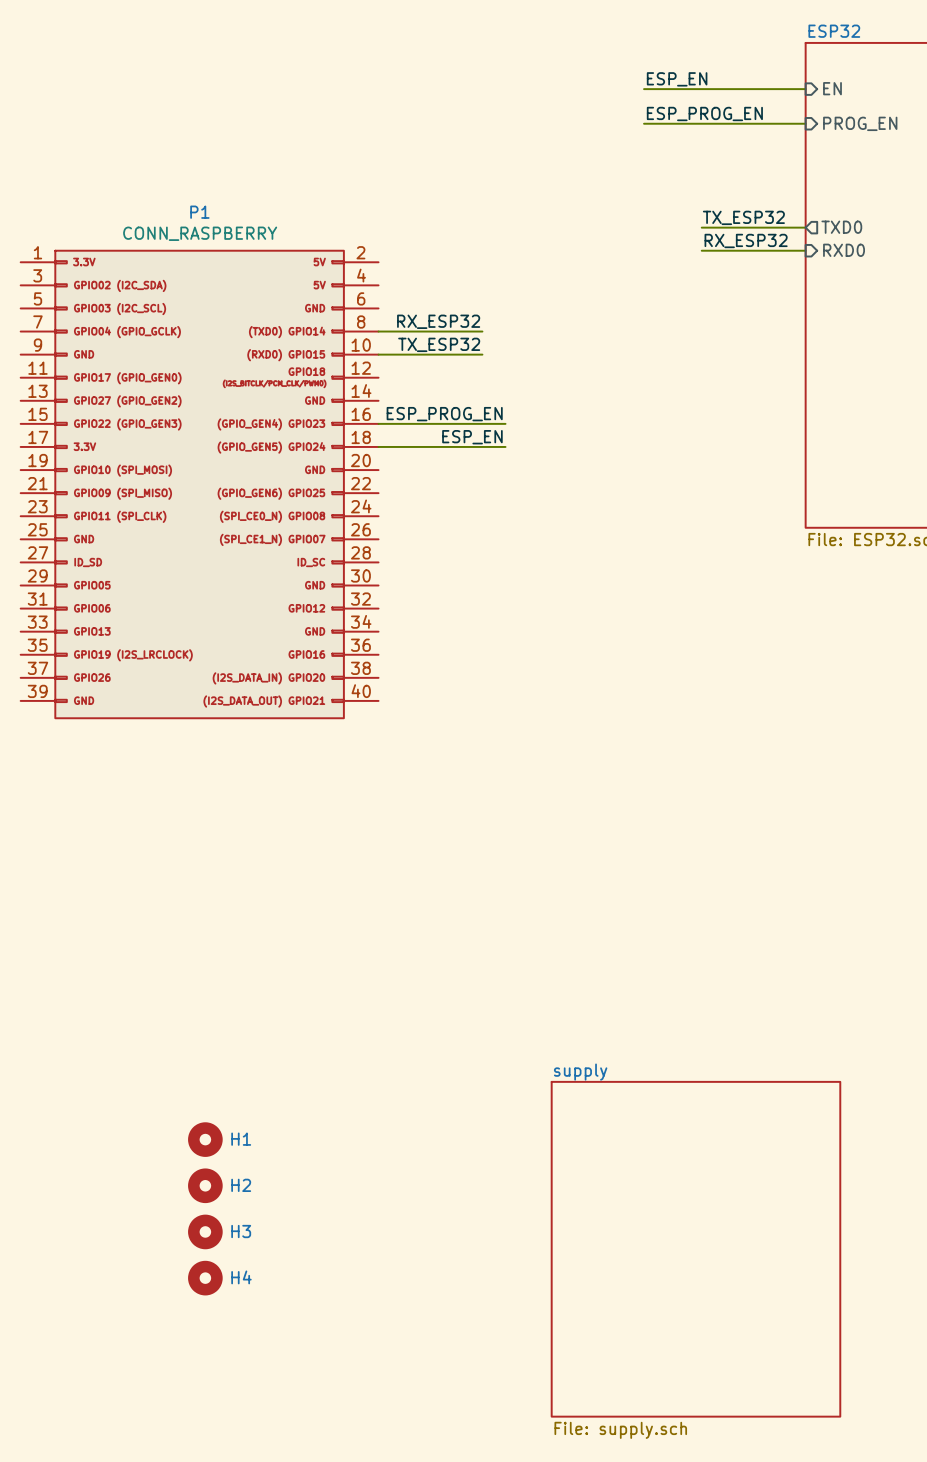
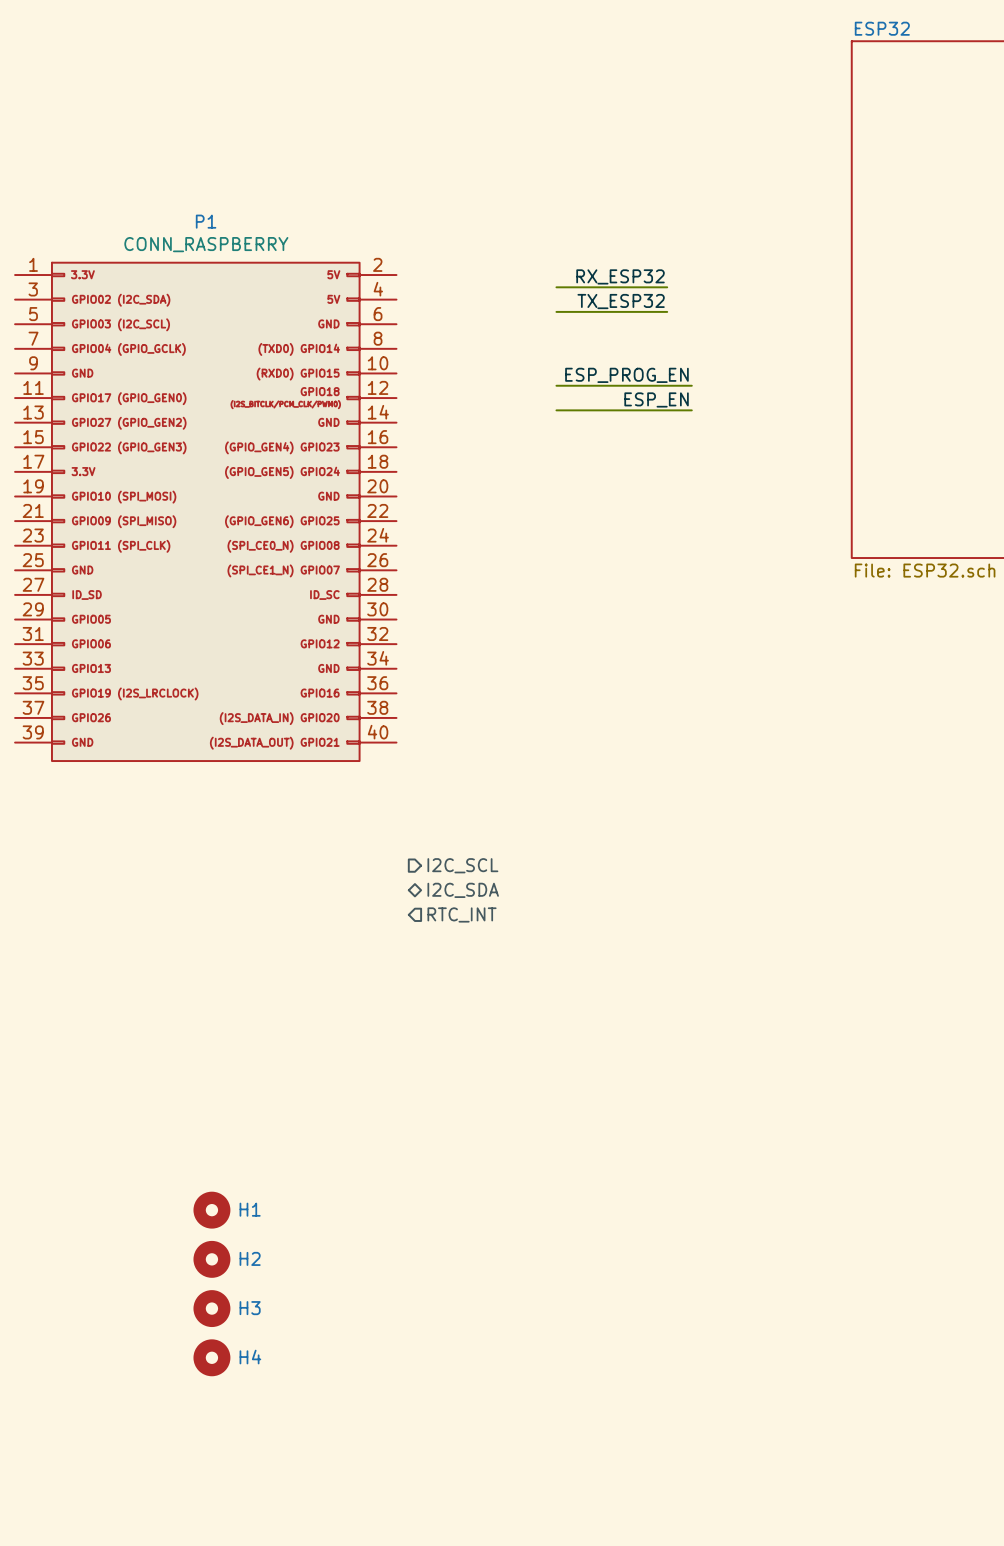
label: ESP_EN (677, 79) -> none
sheet pin: EN (832, 88) -> none
wire: (644, 89) (805, 89) -> none
label: ESP_PROG_EN (704, 113) -> none
wire: (644, 123) (805, 123) -> none
sheet pin: PROG_EN (860, 123) -> none
label: TX_ESP32 (743, 217) -> none
wire: (701, 227) (805, 227) -> none
sheet pin: TXD0 (841, 227) -> none
label position: RX_ESP32 (746, 240) -> RX_ESP32 (620, 276)
wire: (701, 250) (805, 250) -> none
sheet pin: RXD0 (844, 250) -> none
label: none -> TX_ESP32 (621, 301)
label: RX_ESP32 (438, 321) -> none
wire: (378, 331) (482, 331) -> (556, 287) (667, 287)
label: TX_ESP32 (439, 344) -> none
wire: (378, 354) (482, 354) -> (556, 311) (667, 311)
label: none -> ESP_PROG_EN (626, 375)
label: none -> ESP_EN (656, 399)
label: ESP_PROG_EN (444, 414) -> none
wire: (378, 423) (505, 423) -> (556, 385) (691, 385)
label: ESP_EN (472, 437) -> none
wire: (378, 446) (505, 446) -> (556, 410) (691, 410)
sheet pin: none -> I2C_SCL (462, 865)
sheet pin: none -> I2C_SDA (463, 890)
sheet pin: none -> RTC_INT (462, 914)
sheet supply: File: supply.sch (695, 1249) -> none

